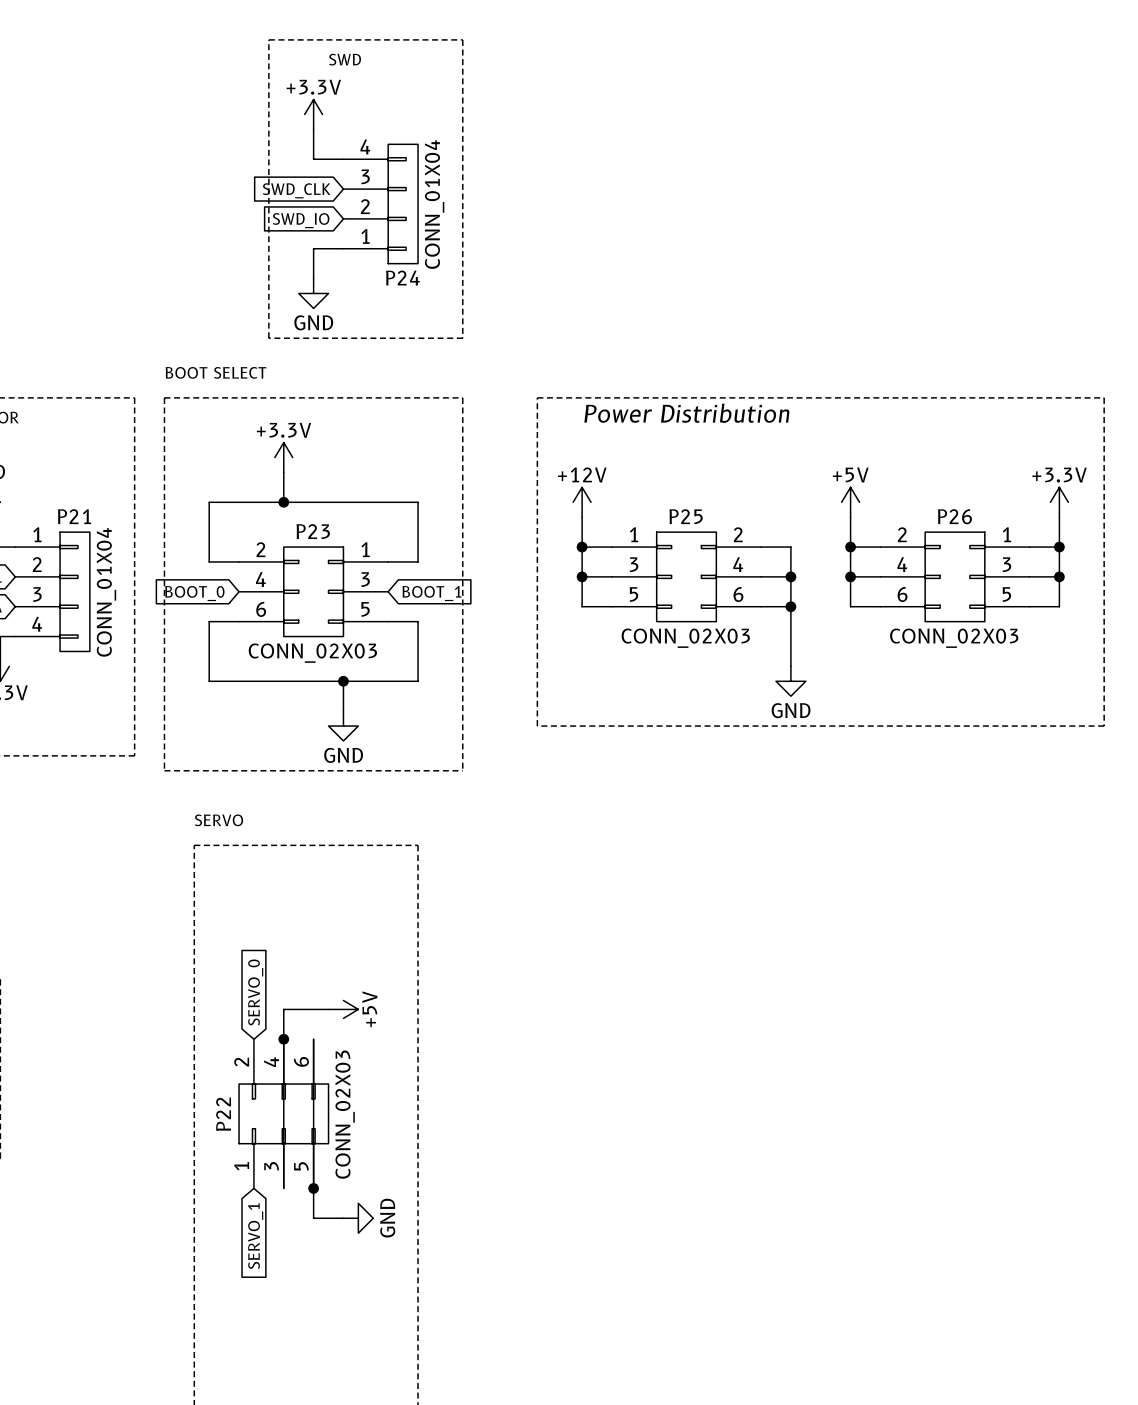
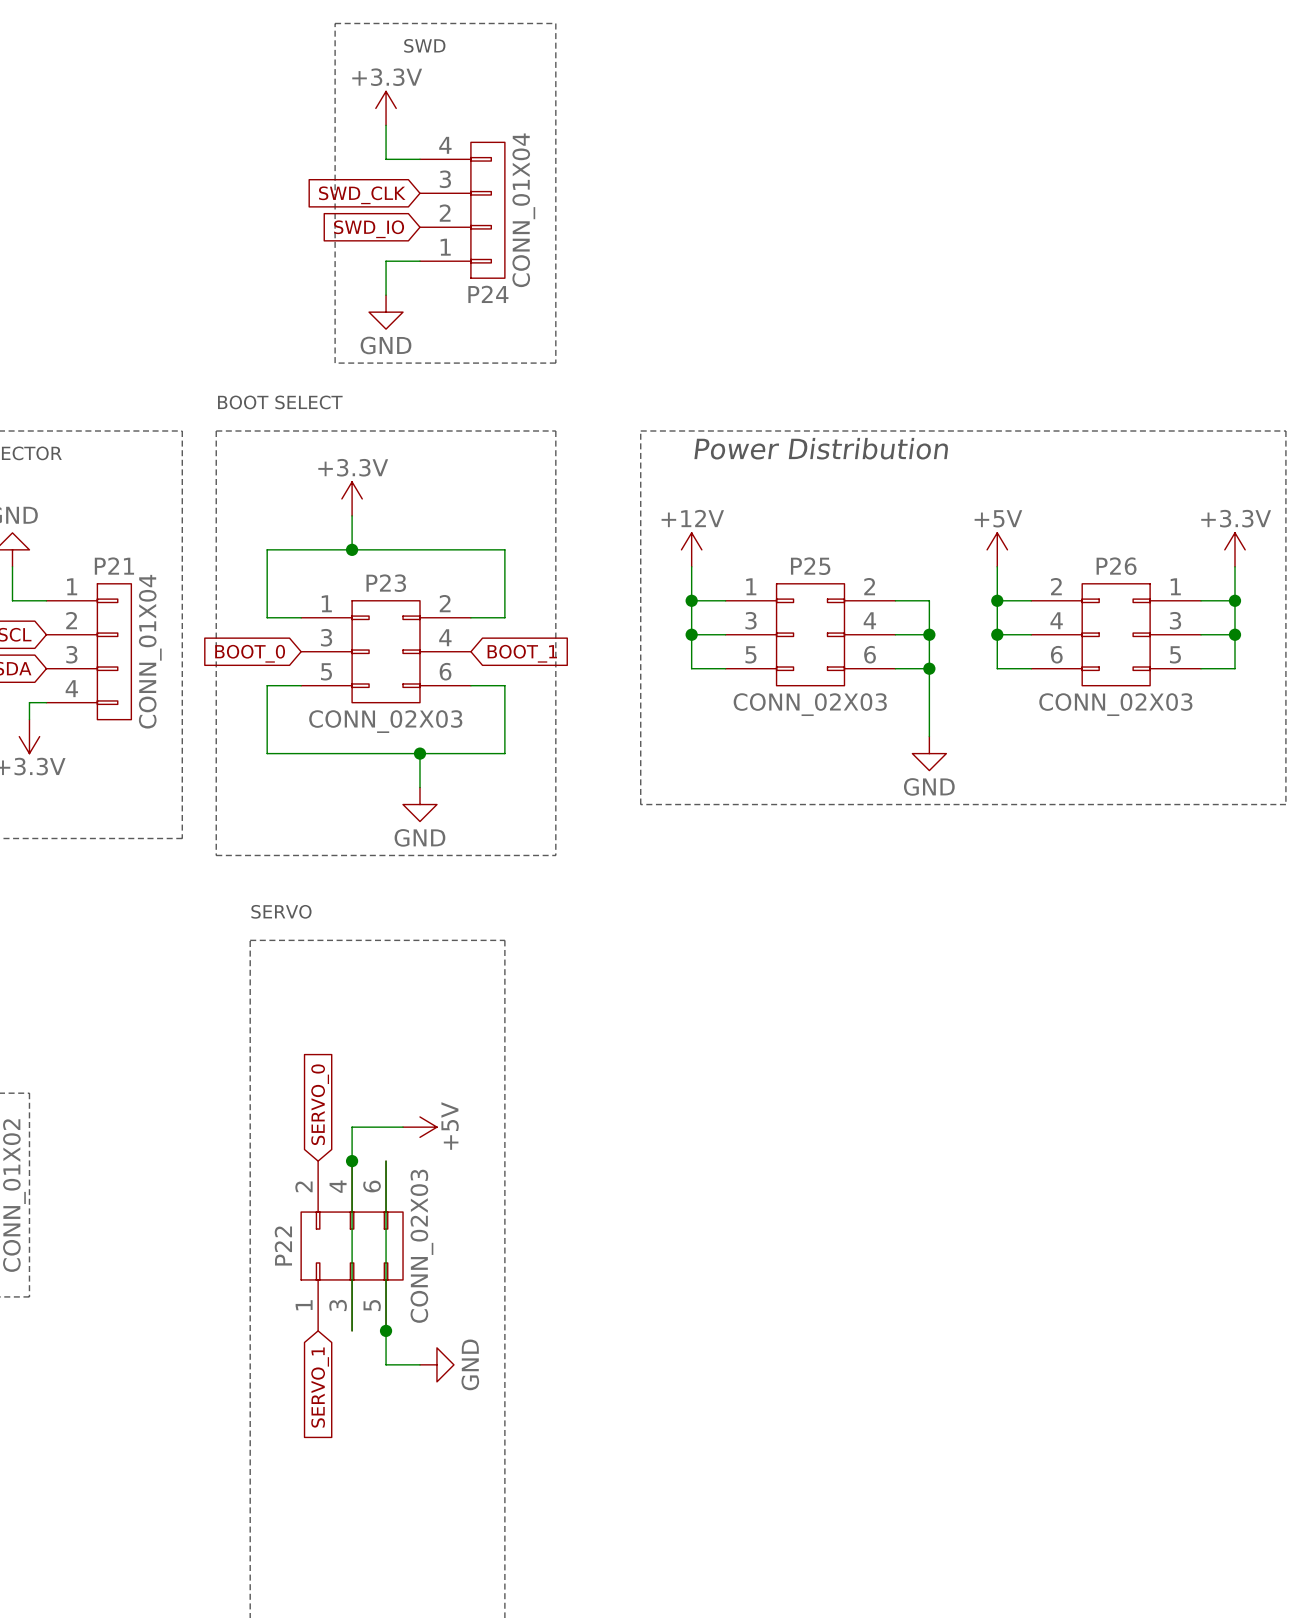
P23 flip: as is (313, 591) -> left-right (386, 651)

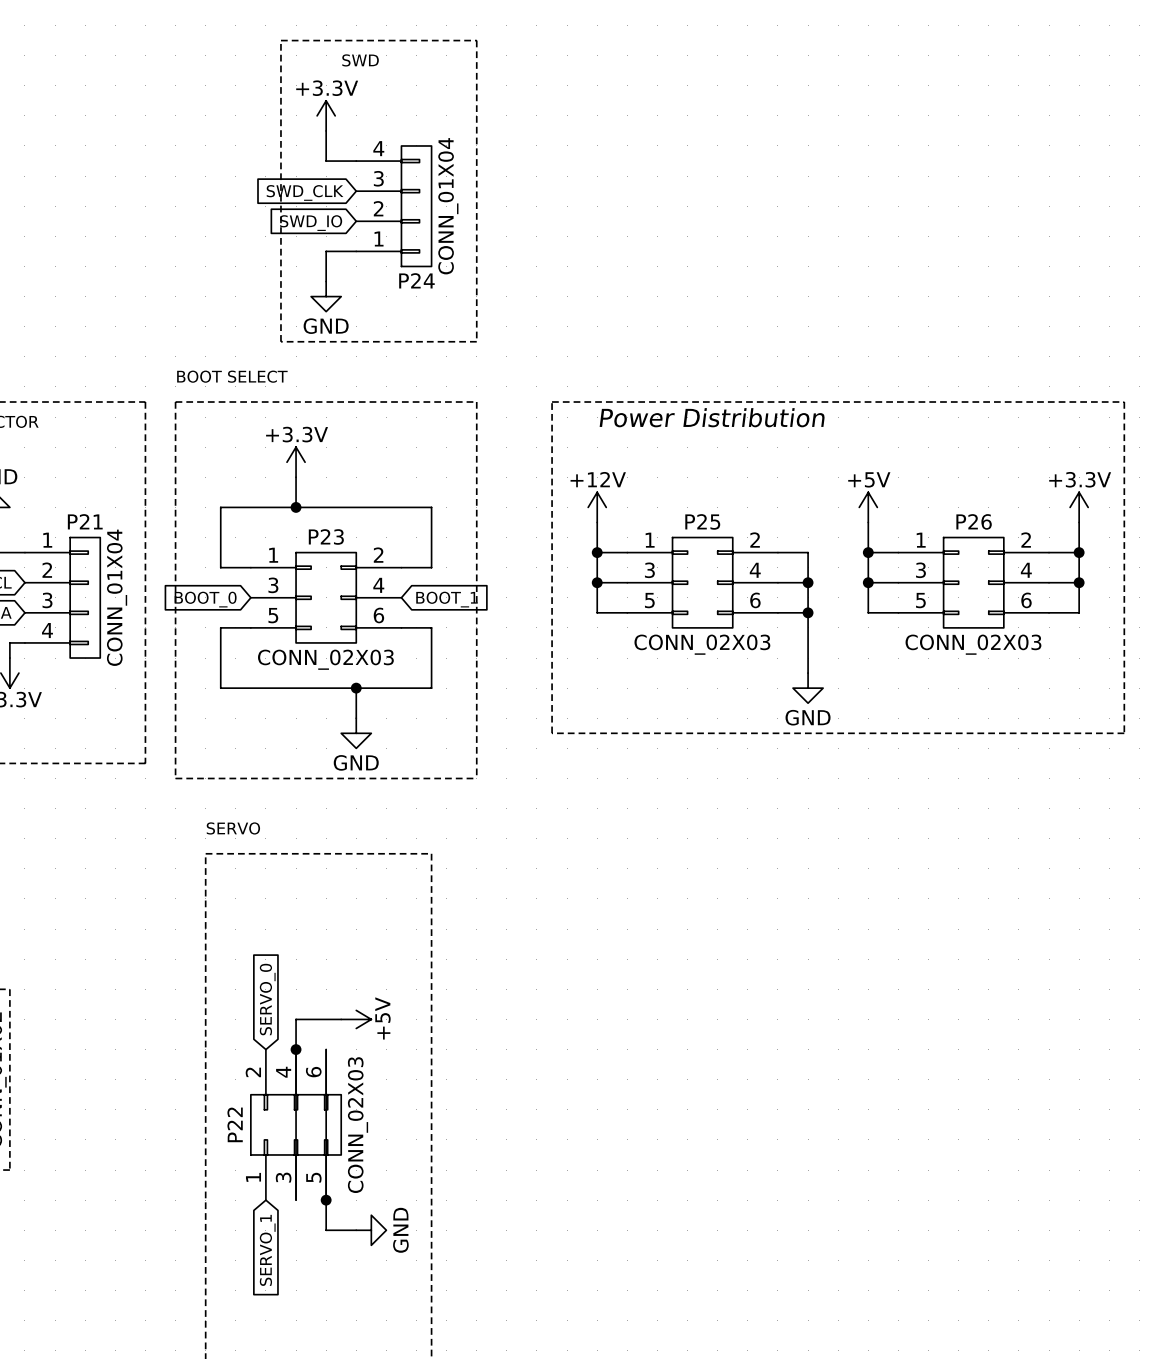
P26 flip: as is (1116, 634) -> left-right (973, 582)

